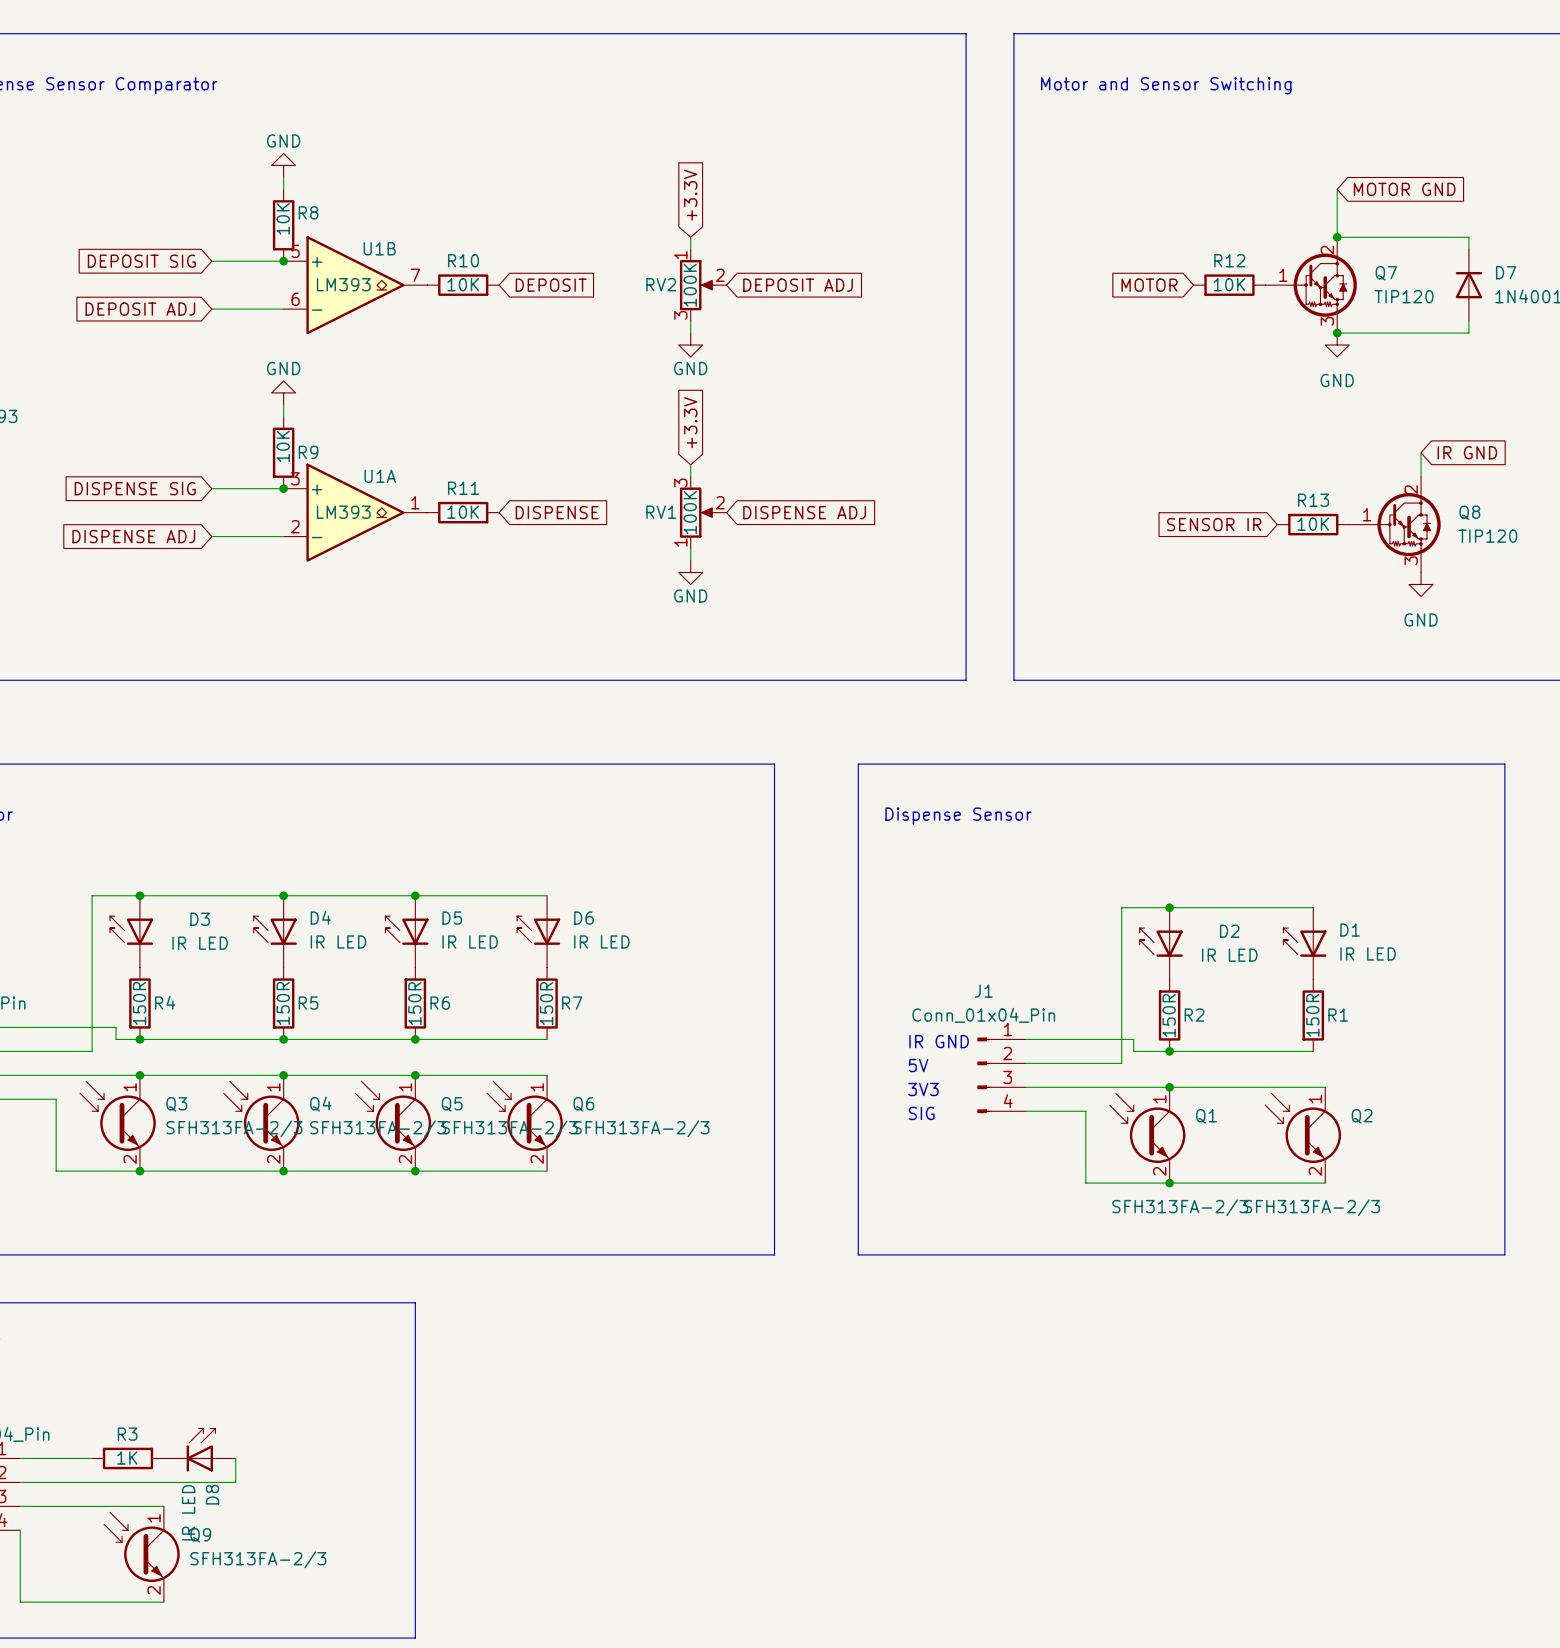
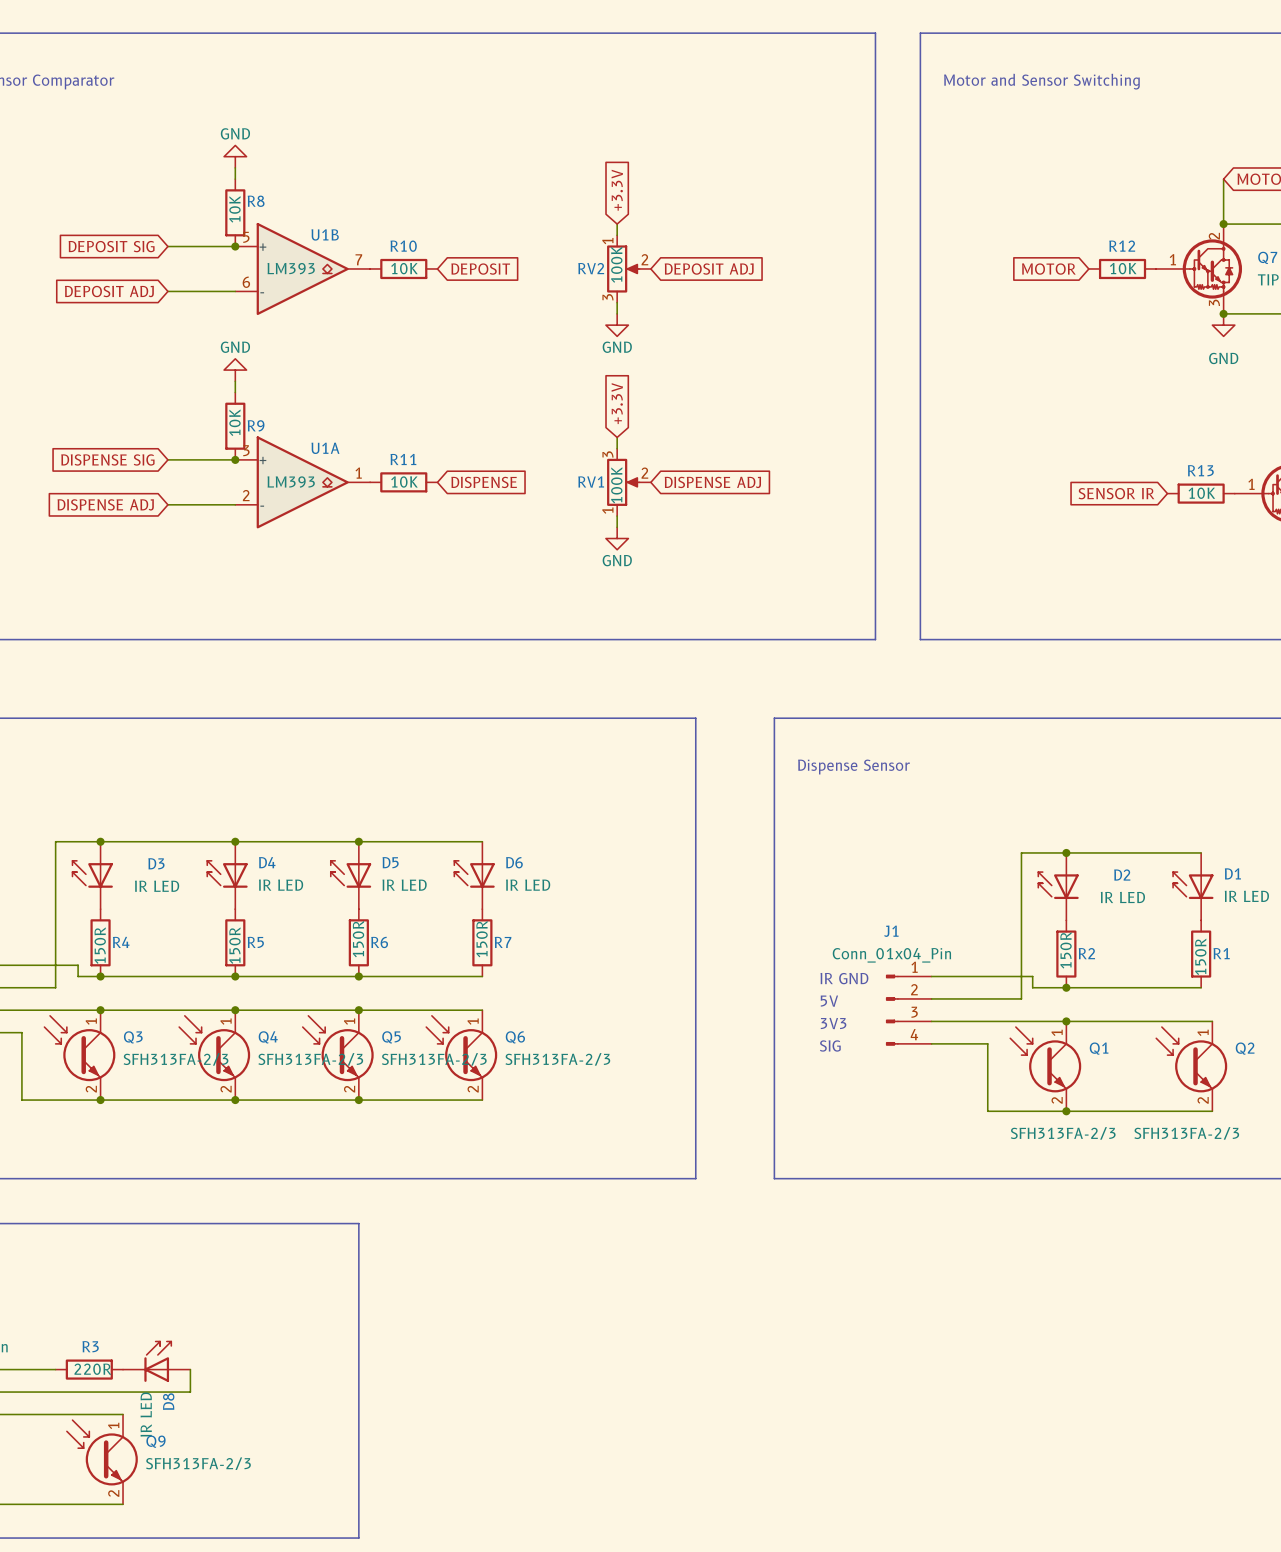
R3 value: 1K (127, 1458) -> 220R (92, 1369)

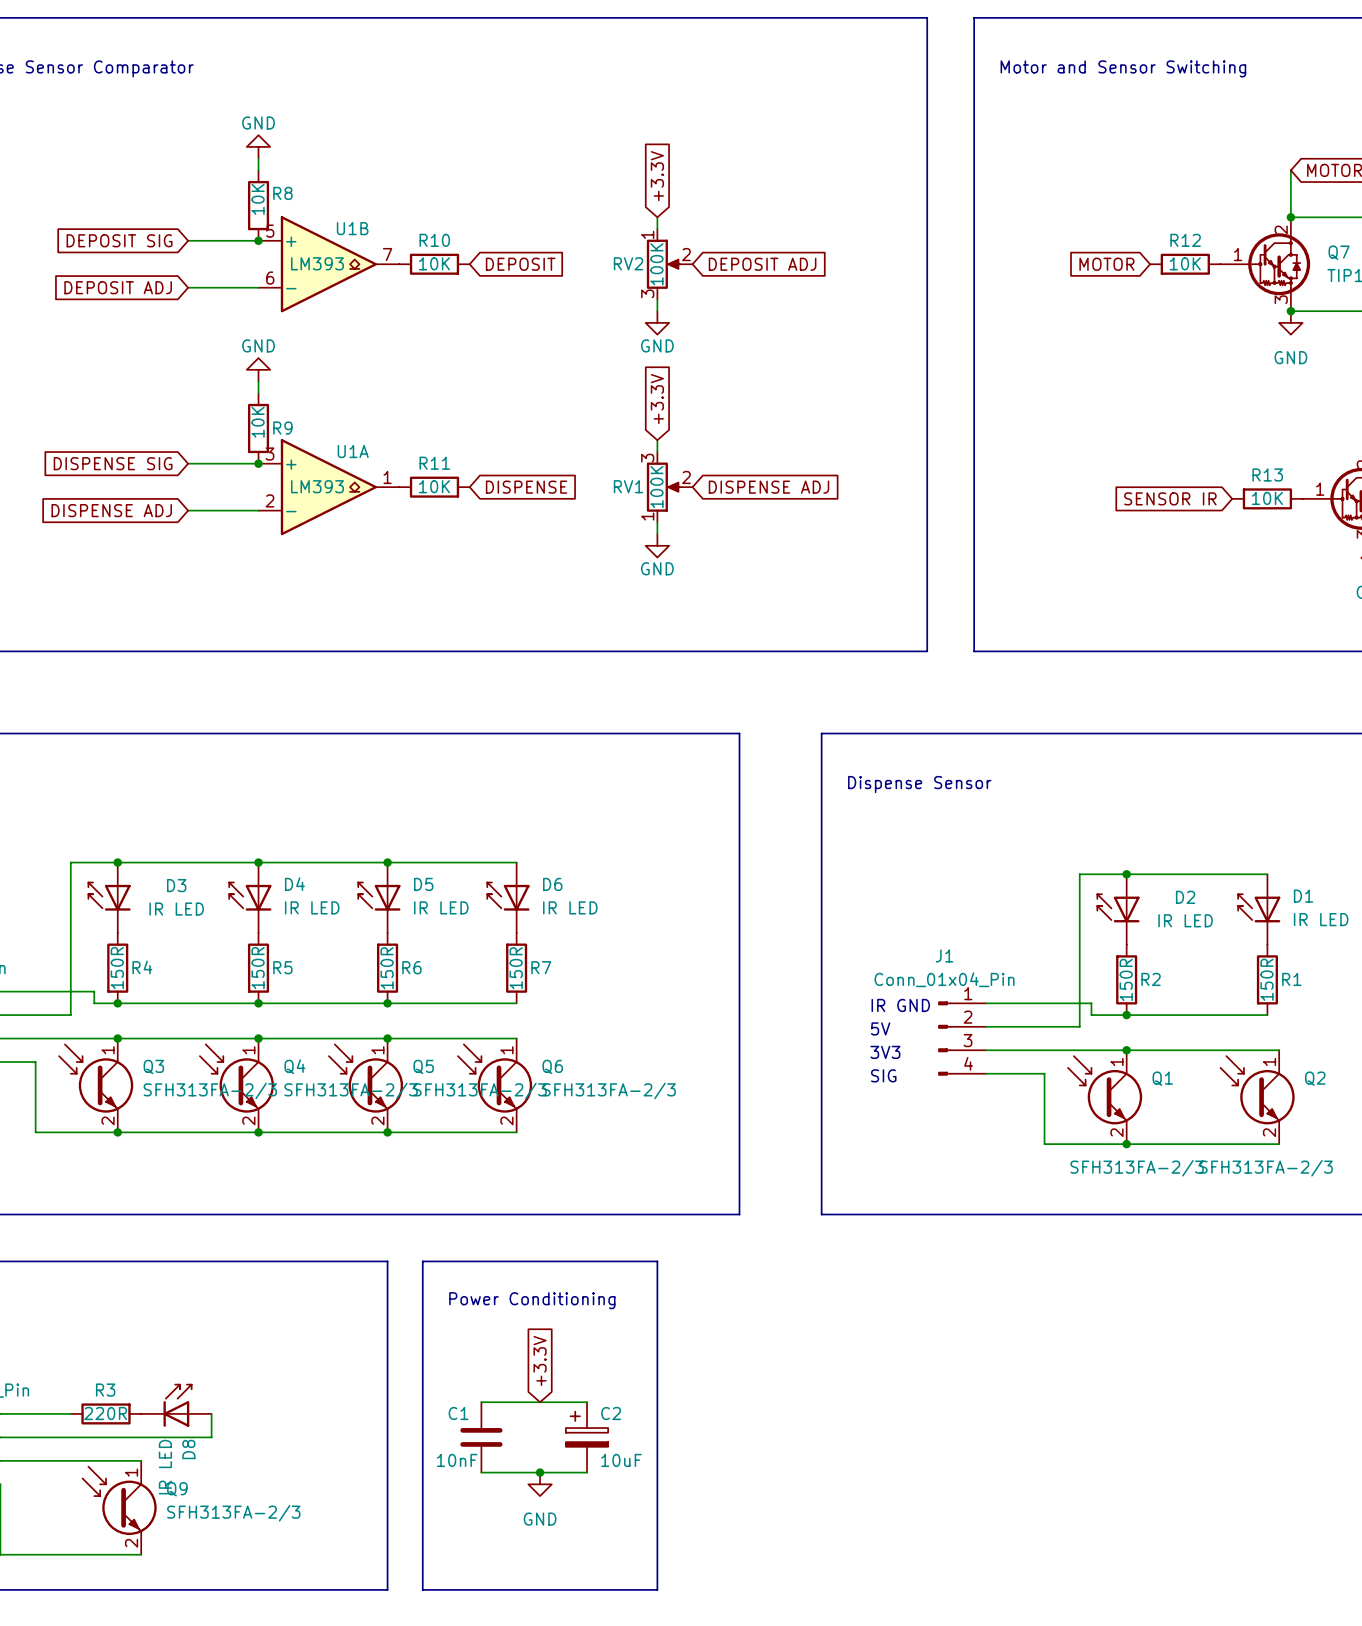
line: none -> (422, 1261) (657, 1261) (657, 1589) (422, 1589) (422, 1261)
text: none -> Power Conditioning (532, 1300)
global label: none -> +3.3V (540, 1360)
wire: none -> (481, 1402) (587, 1402)
C1: none -> 10nF (481, 1437)
C2: none -> 10uF (587, 1437)
wire: none -> (481, 1472) (587, 1472)
junction: none -> (540, 1472)
power symbol: none -> GND (540, 1484)

